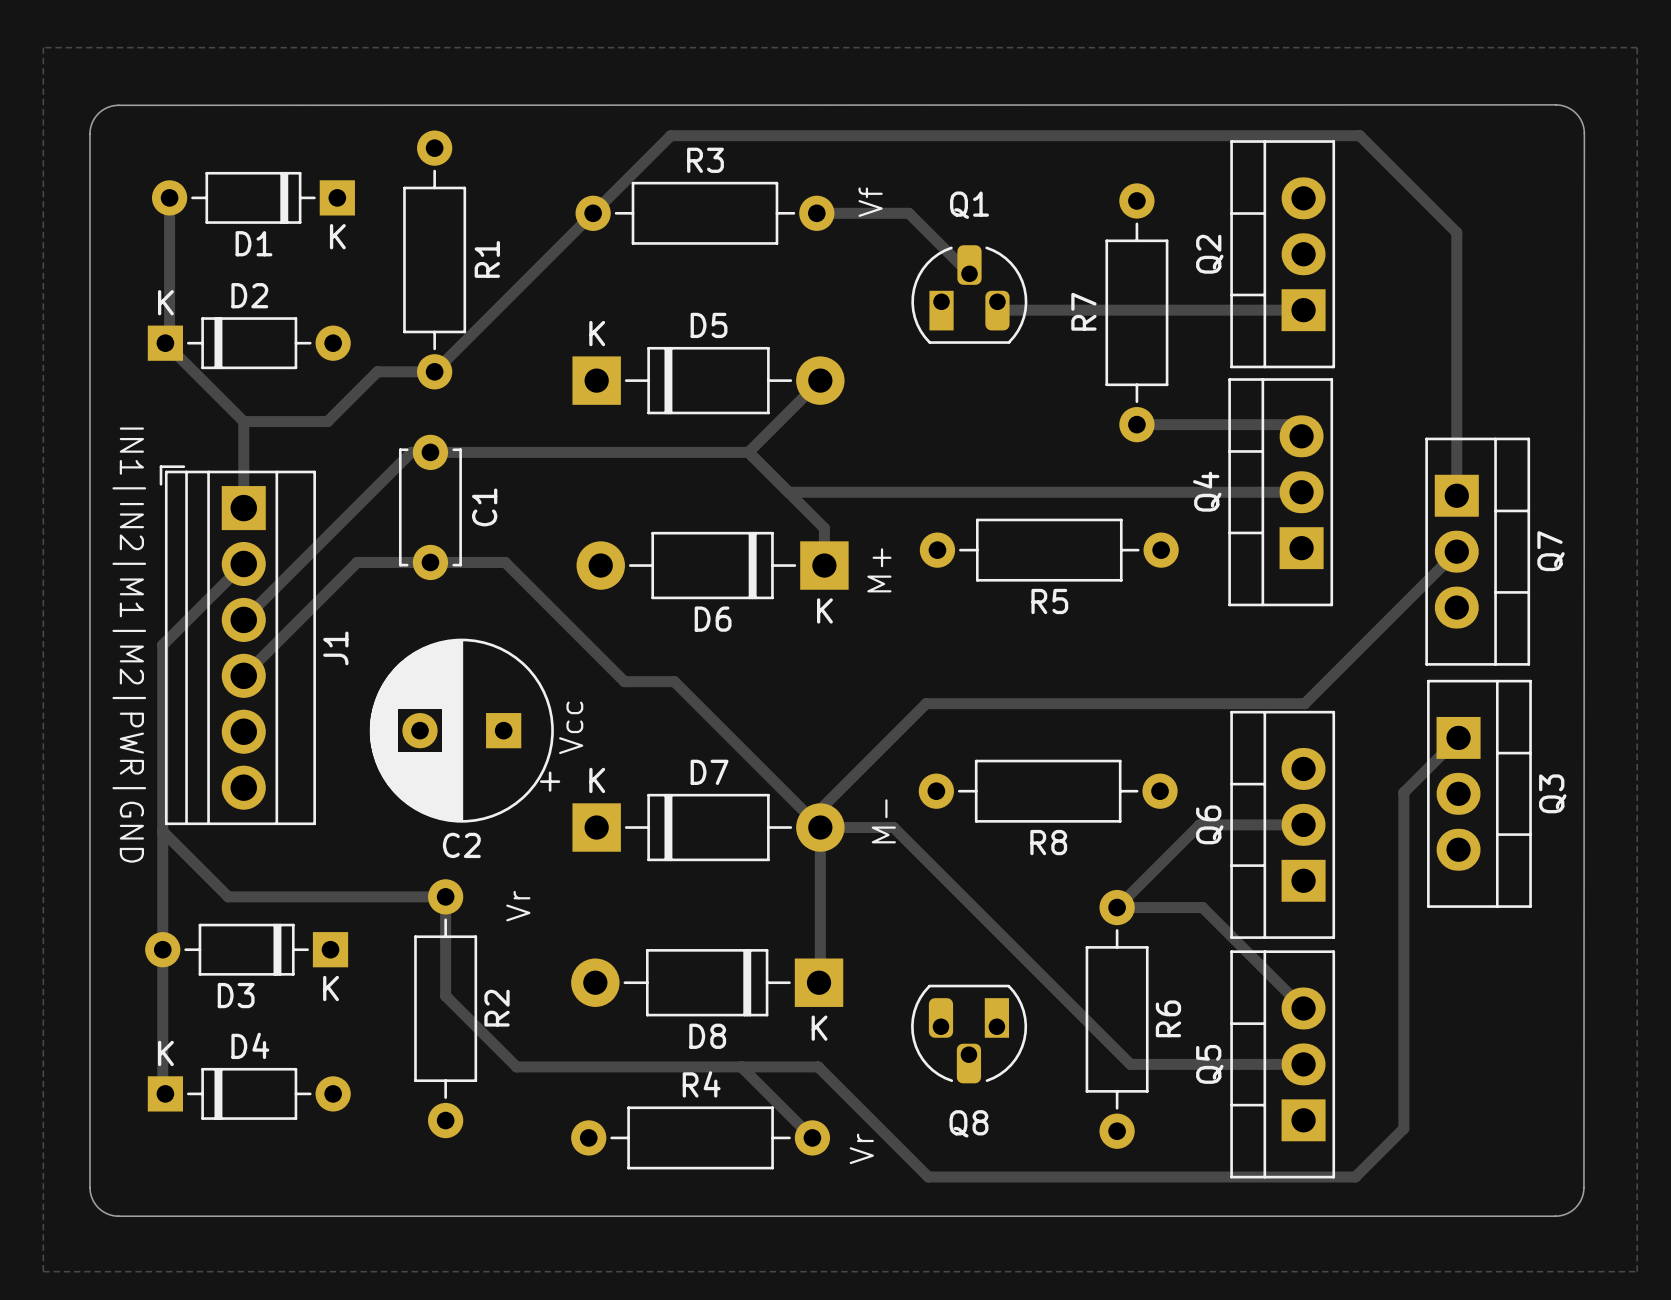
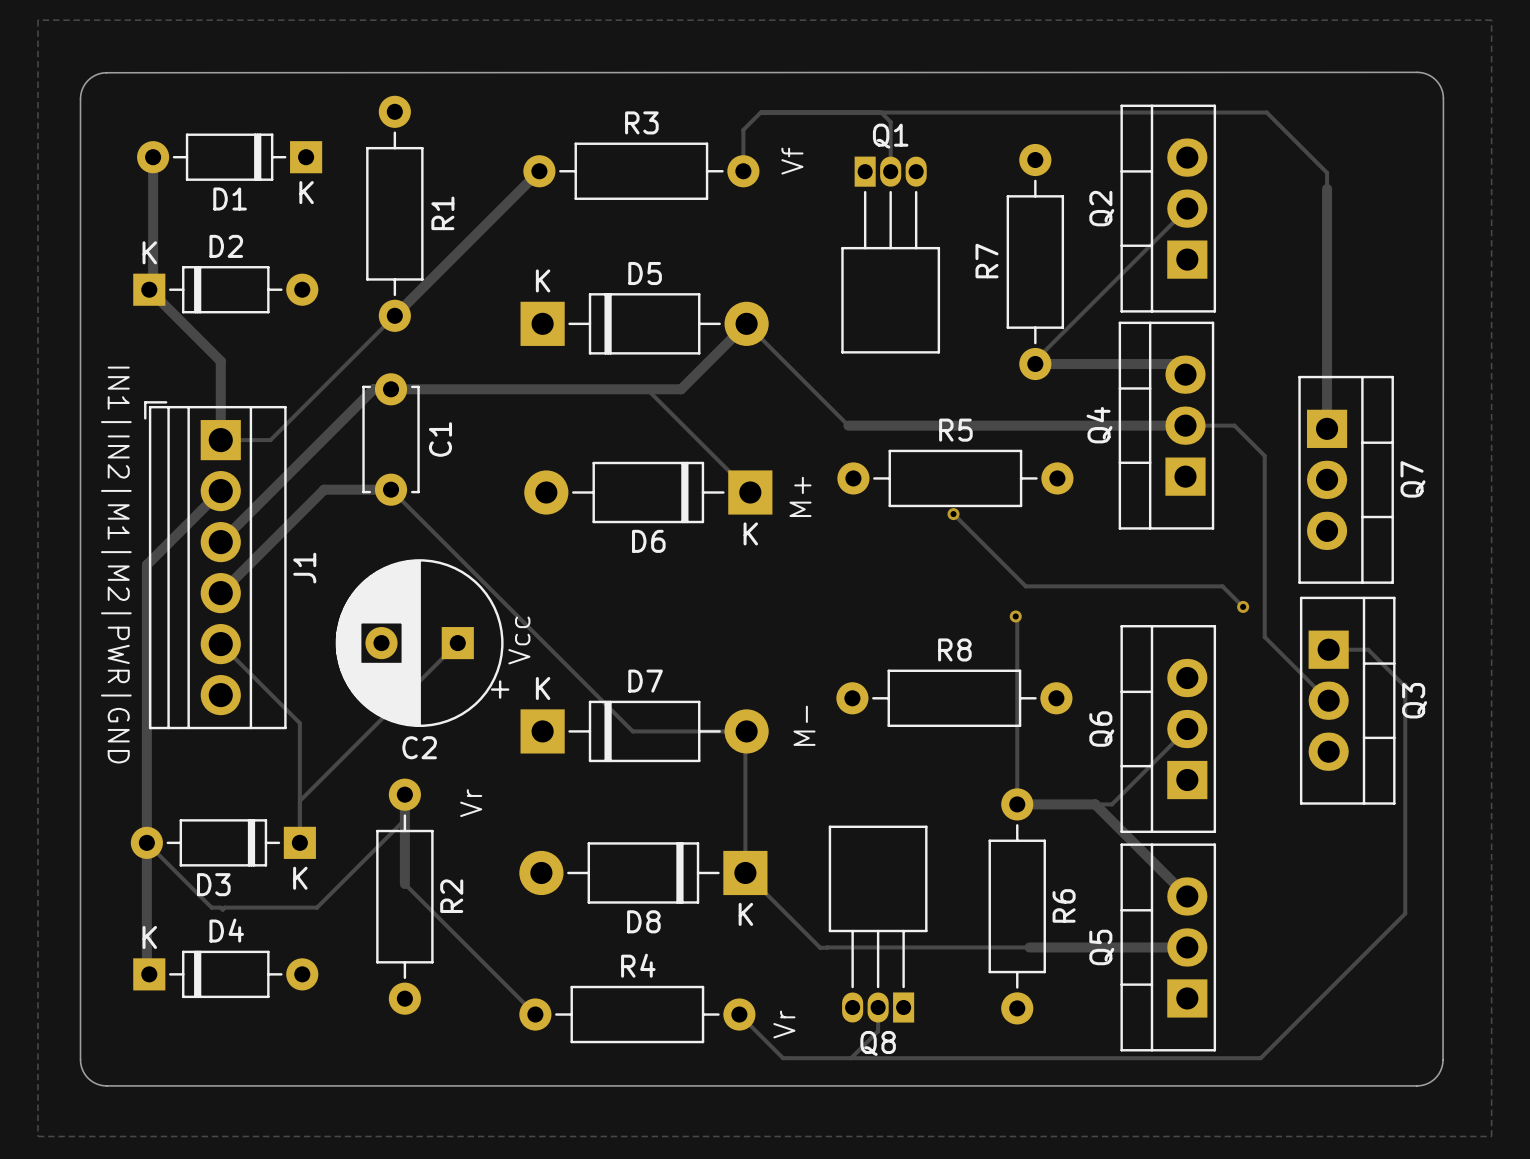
track: none -> (881, 112) (890, 121) (890, 171)
track: (593, 213) (670, 135) (1359, 135) (1456, 232) -> (743, 171) (743, 129) (760, 112) (1266, 112) (1327, 172) (1327, 188)
track: (816, 213) (908, 213) (969, 273) -> none
Q1 footprint: [911, 245, 1028, 344] -> [841, 156, 941, 354]
track: none -> (1187, 208) (1035, 360) (1035, 364)
track: (997, 301) (1005, 310) (1303, 310) -> none
track: (434, 371) (377, 371) (327, 421) (243, 421) -> (394, 315) (270, 440) (220, 440)
track: (748, 452) (824, 528) (824, 565) -> (647, 389) (750, 492)
track: (788, 492) (931, 492) -> (746, 323) (848, 425)
track: none -> (1185, 425) (1234, 425) (1264, 455) (1264, 637) (1328, 700)
track: (1456, 551) (1304, 703) (926, 703) (820, 809) (819, 982) -> none
track: (430, 562) (505, 562) (624, 681) (674, 681) (820, 827) (893, 827) (1130, 1064) -> (391, 489) (632, 731) (746, 731) (745, 872) (820, 947) (1029, 947)
track: none -> (953, 514) (1025, 586) (1222, 586) (1243, 606)
via: none -> (953, 514)
R5 name position: R5 (1049, 601) -> R5 (955, 430)
via: none -> (1243, 606)
track: none -> (1015, 616) (1017, 804)
via: none -> (1015, 616)
track: none -> (457, 643) (299, 801)
track: none -> (220, 644) (299, 723) (299, 842)
track: (1458, 737) (1403, 792) (1403, 1128) (1355, 1177) (928, 1177) (818, 1066) (516, 1066) (445, 994) -> (1328, 649) (1368, 649) (1405, 684) (1405, 913) (1260, 1058) (783, 1058) (739, 1014)
track: (1303, 824) (1199, 824) (1117, 907) -> (1187, 729) (1111, 804) (1095, 804)
track: (162, 831) (228, 896) (445, 896) -> none
R8 name position: R8 (1048, 842) -> R8 (954, 649)
track: none -> (404, 819) (317, 907) (224, 907) (222, 909) (220, 907) (211, 907) (146, 842)
Q8 footprint: [911, 984, 1028, 1084] -> [828, 825, 928, 1023]
track: none -> (404, 884) (535, 1014)
track: (741, 1066) (812, 1137) -> none
track: none -> (878, 1007) (878, 1031) (851, 1058)

